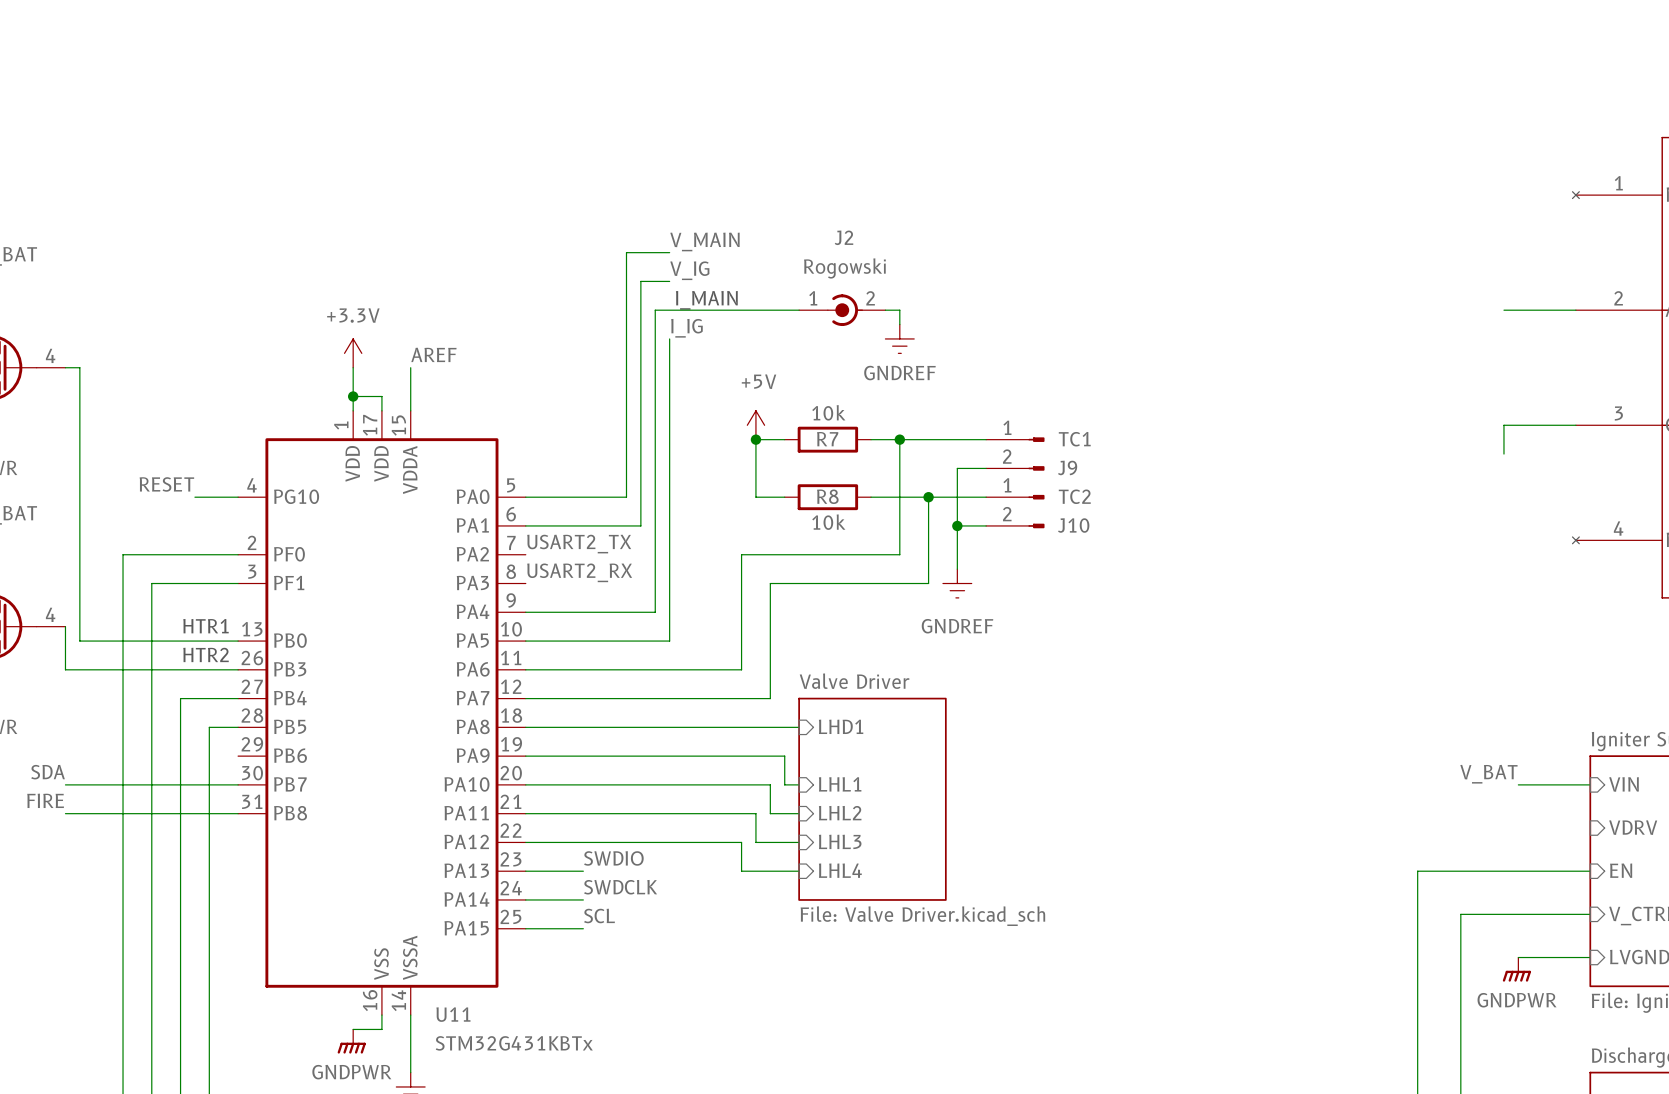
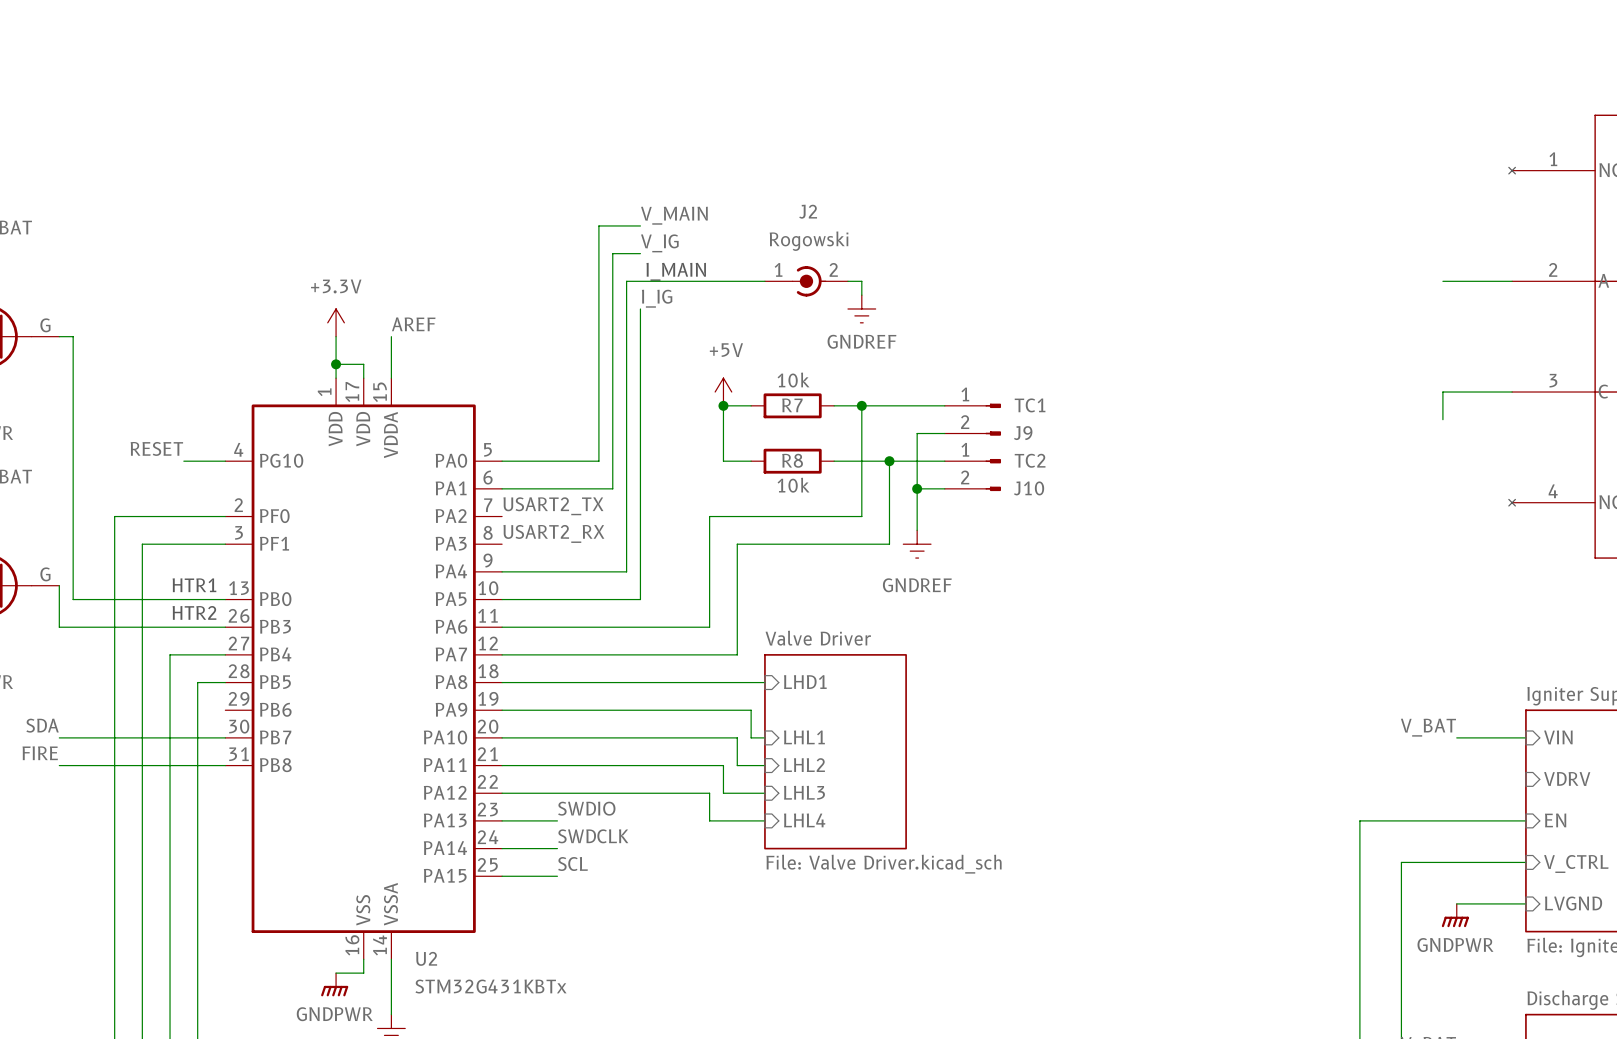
part pin number: 4 (50, 355) -> none
part pin name: none -> G (45, 325)
part pin number: 4 (50, 614) -> none
part pin name: none -> G (45, 574)
U11 name: U11 (453, 1014) -> U2 (426, 958)

